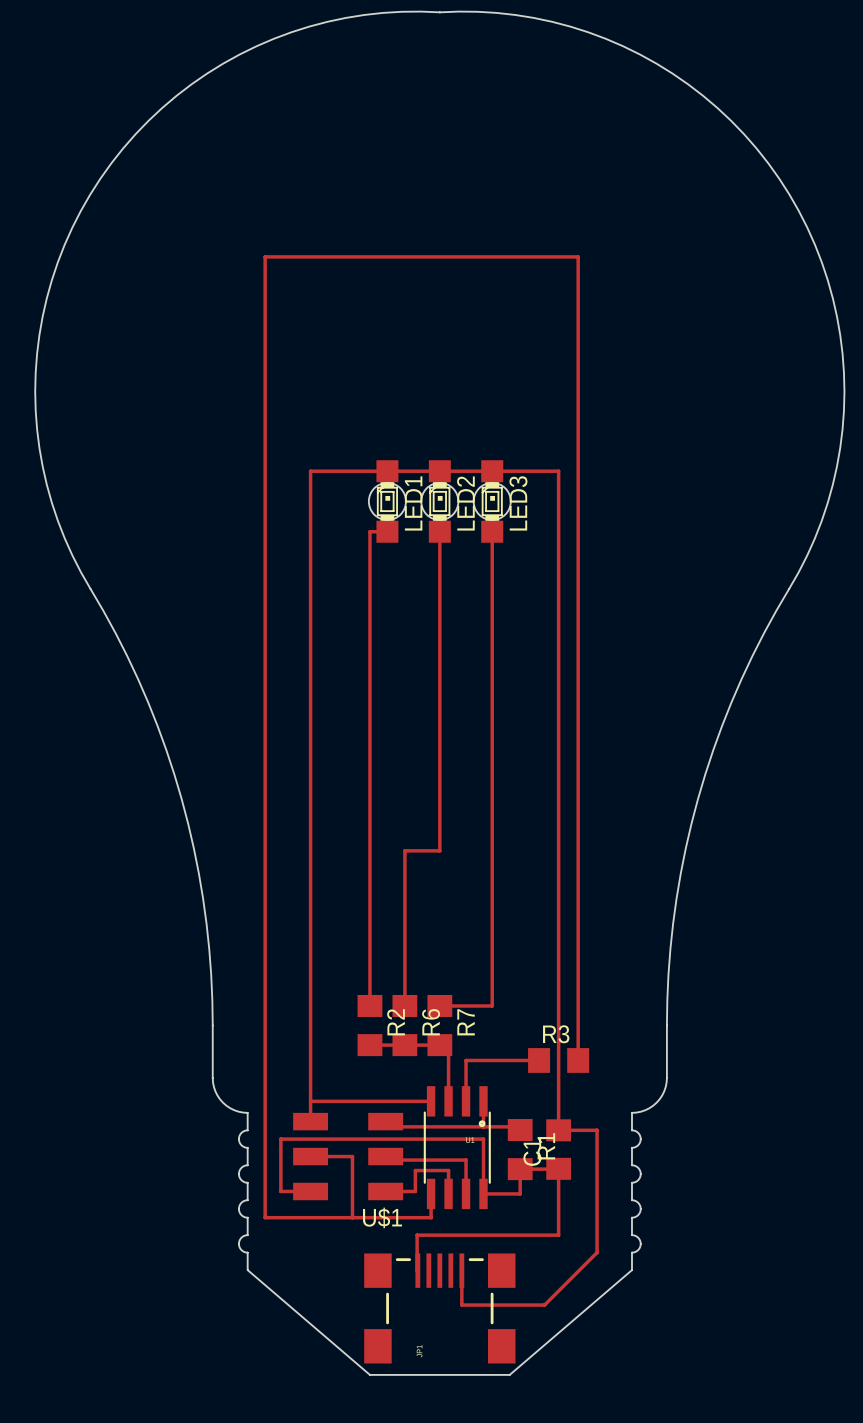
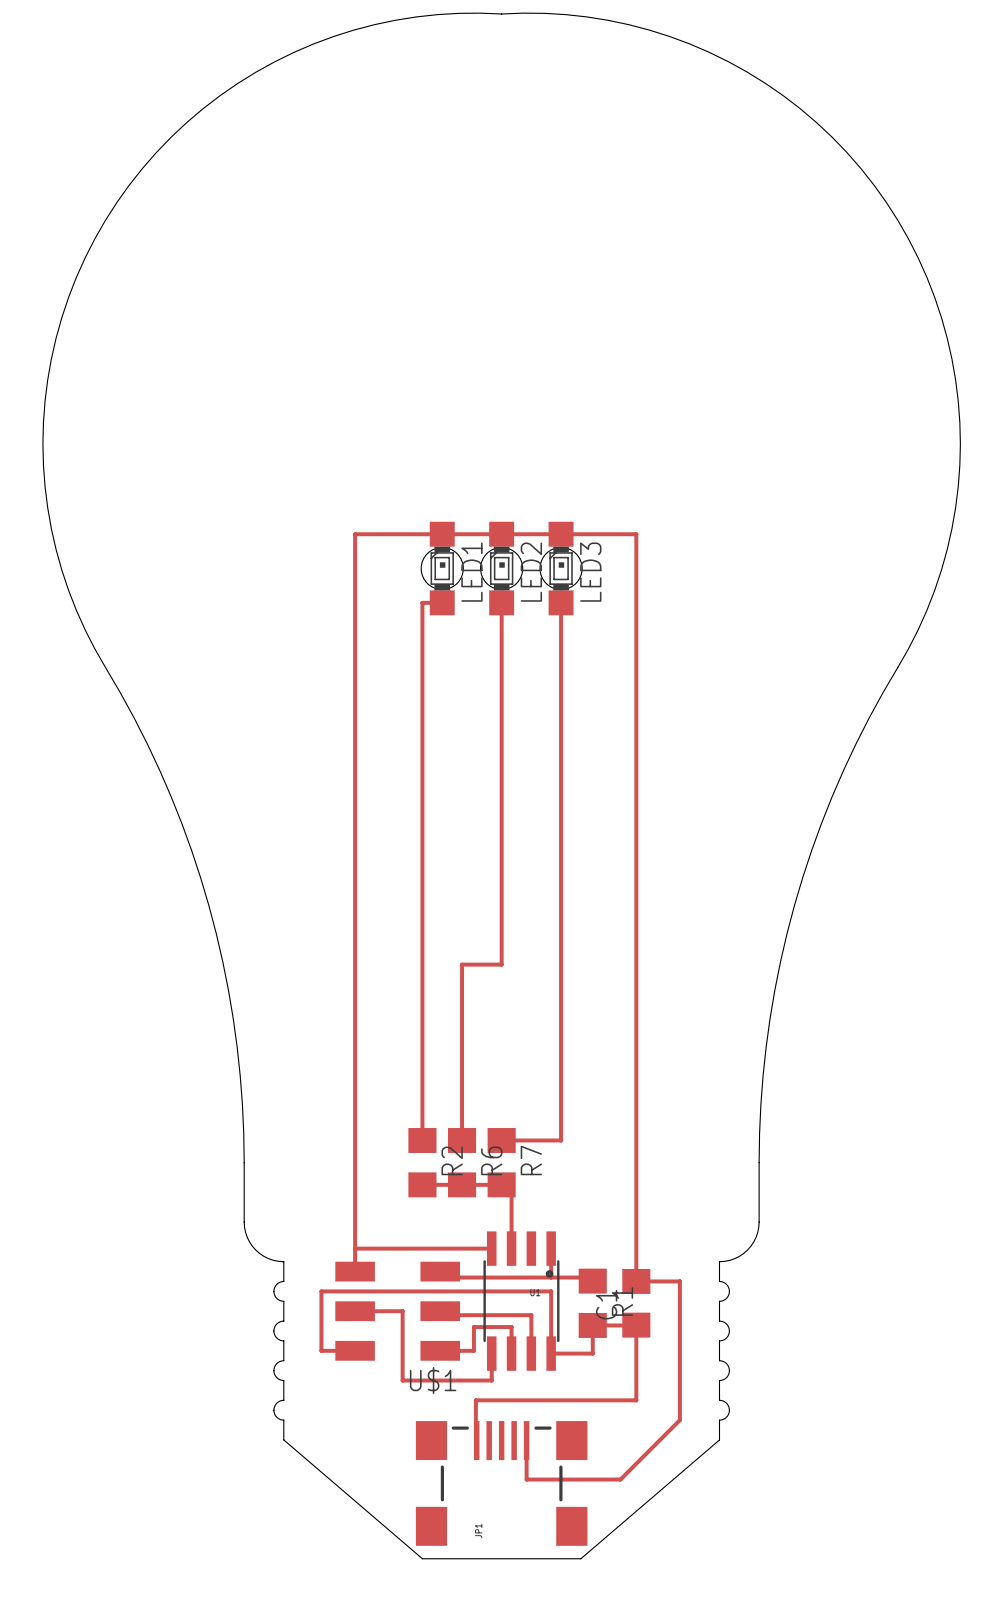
top track: (539, 1060) (466, 1060) (466, 1101) -> none
R3: (558, 1060) -> none
top track: (578, 1060) (578, 256) (265, 256) (265, 1217) (352, 1217) -> none

